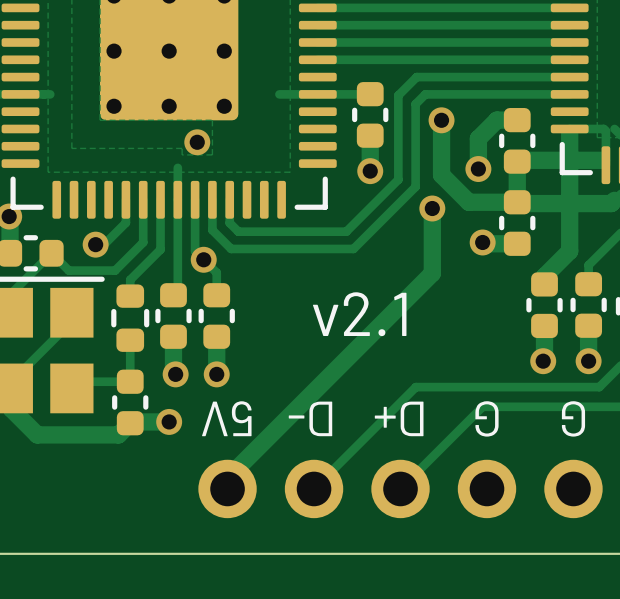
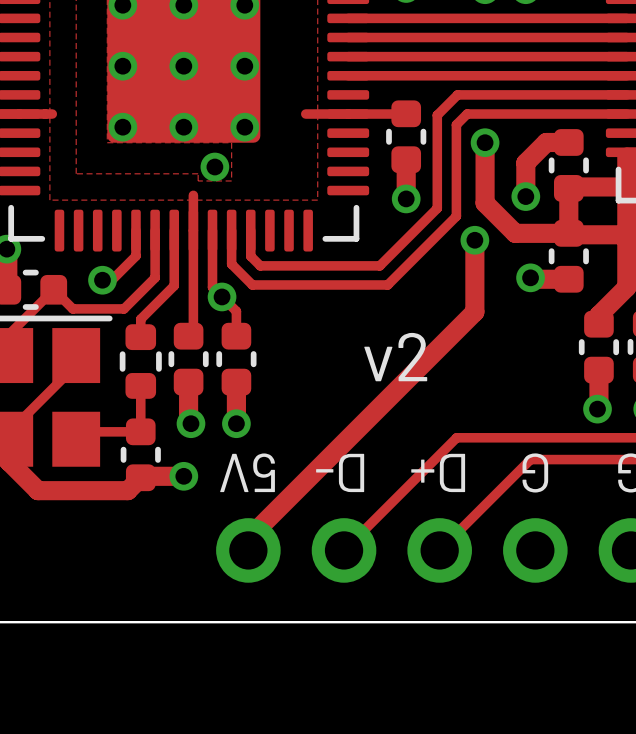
text: v2.1 (359, 314) -> v2 (395, 357)

